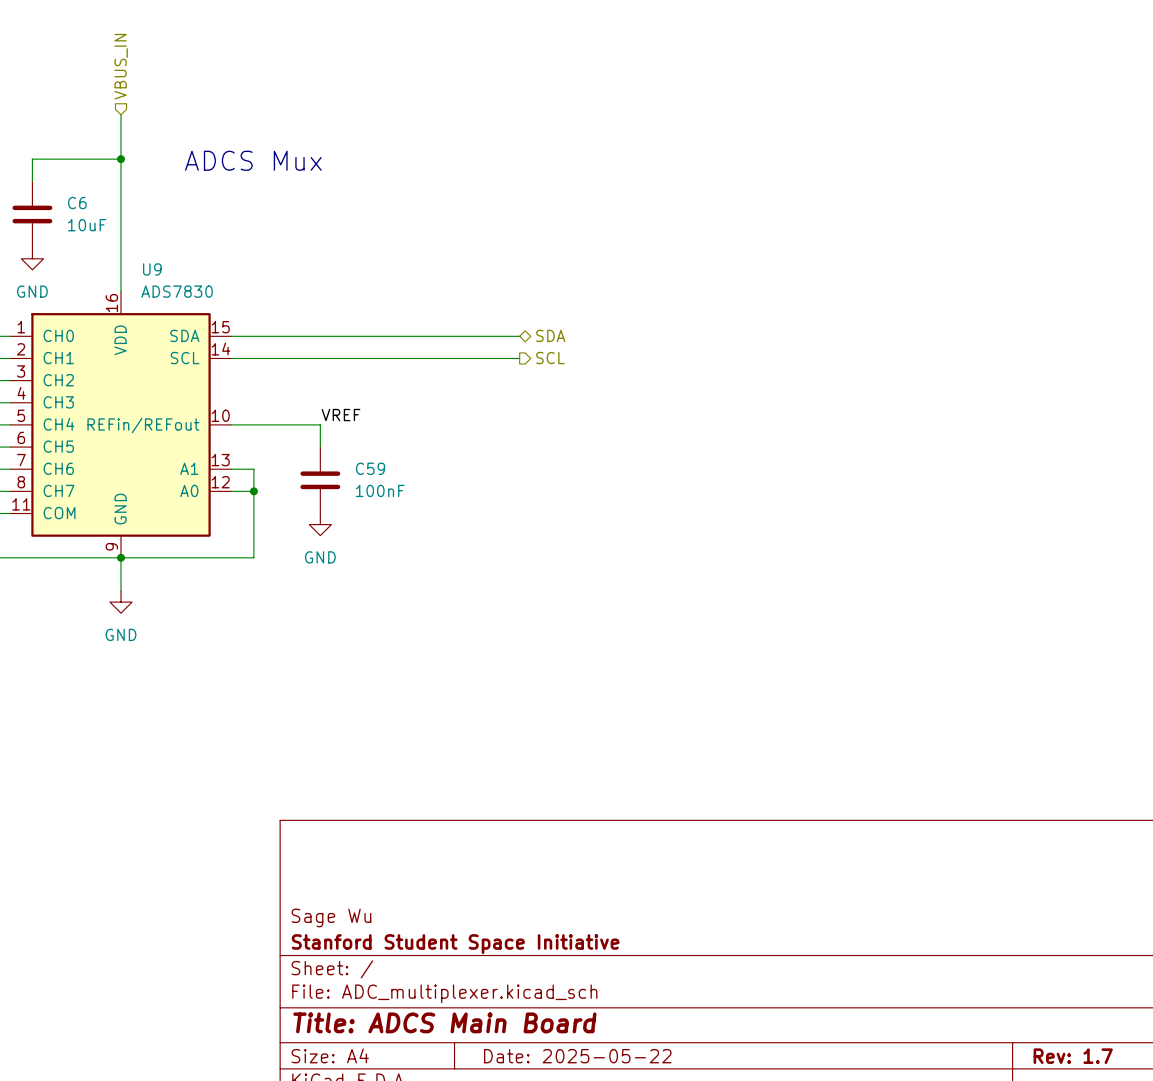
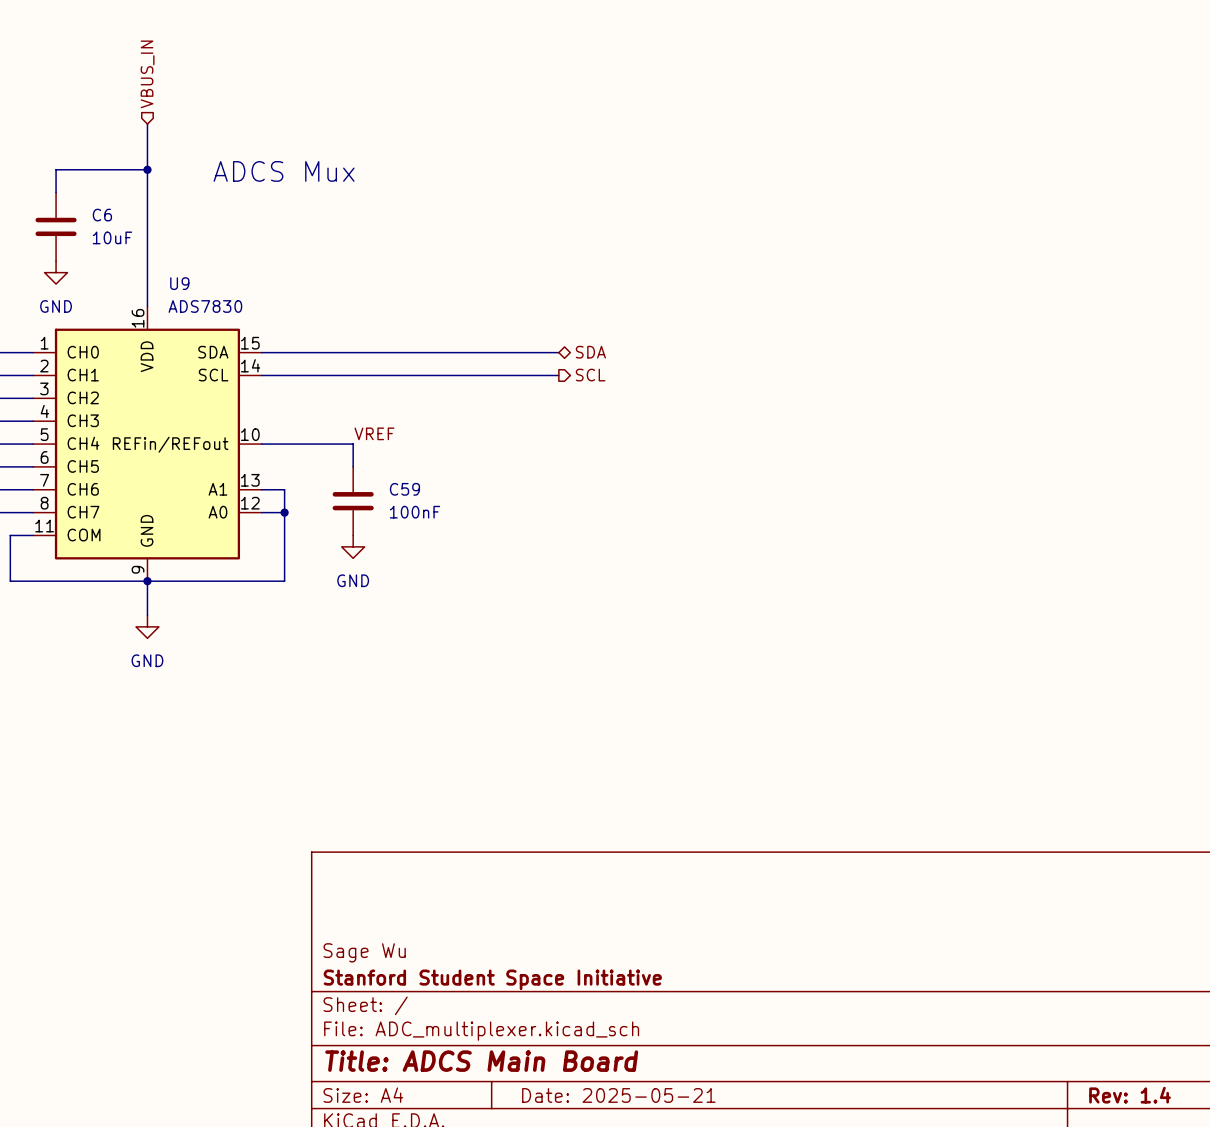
title block: Date: 2025-05-22 (577, 1056) -> Date: 2025-05-21 (618, 1095)
title block: Rev: 1.7 (1073, 1056) -> Rev: 1.4 (1130, 1095)

